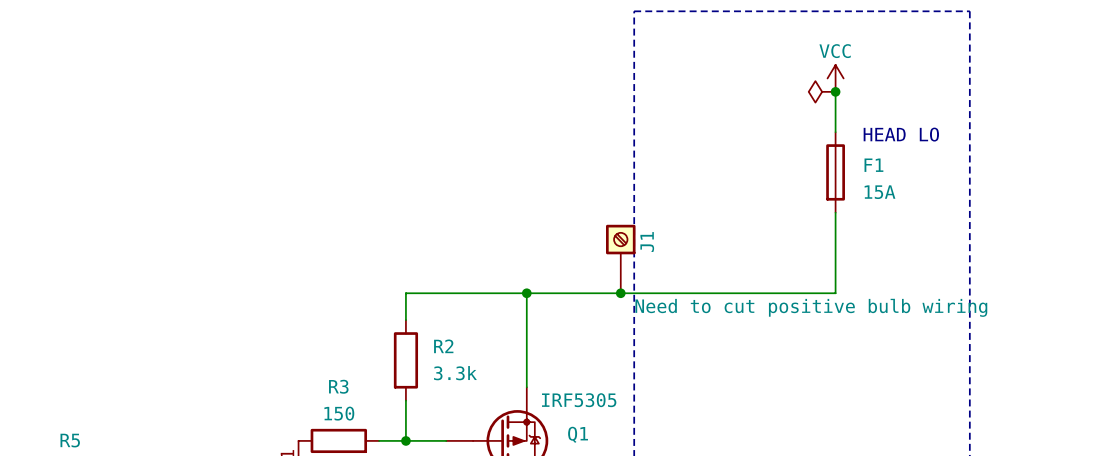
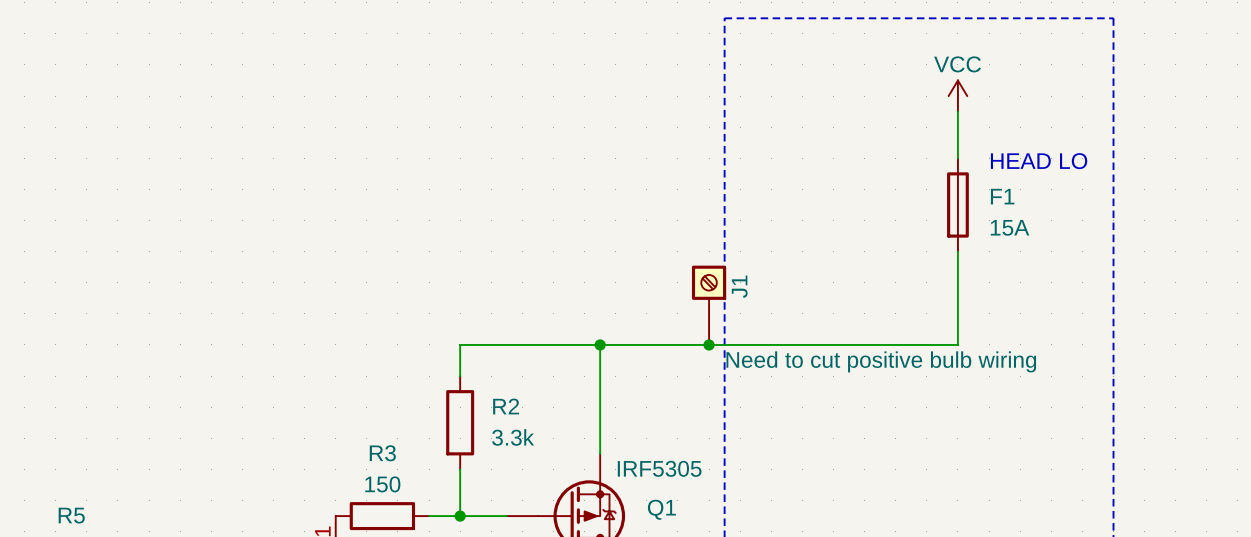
power symbol: (822, 91) -> none
junction: (835, 91) -> none

